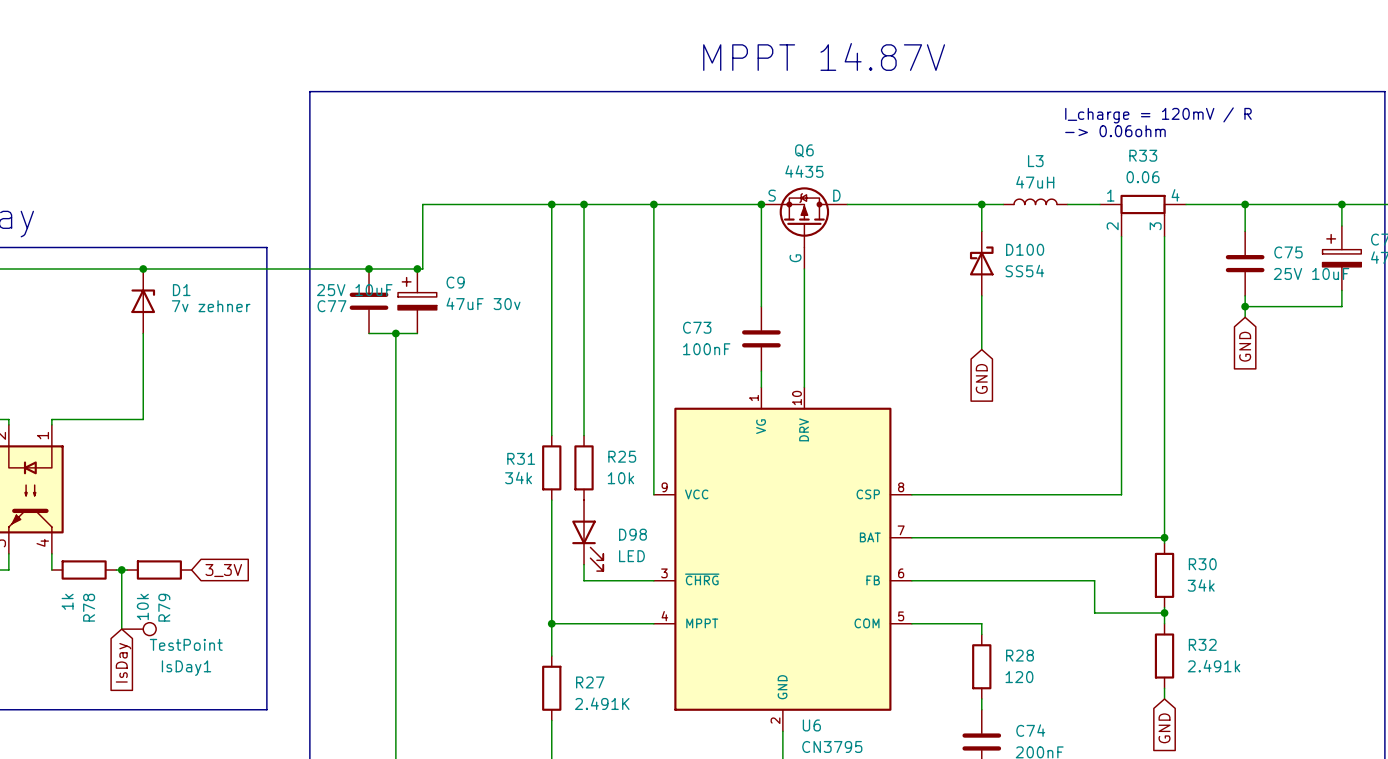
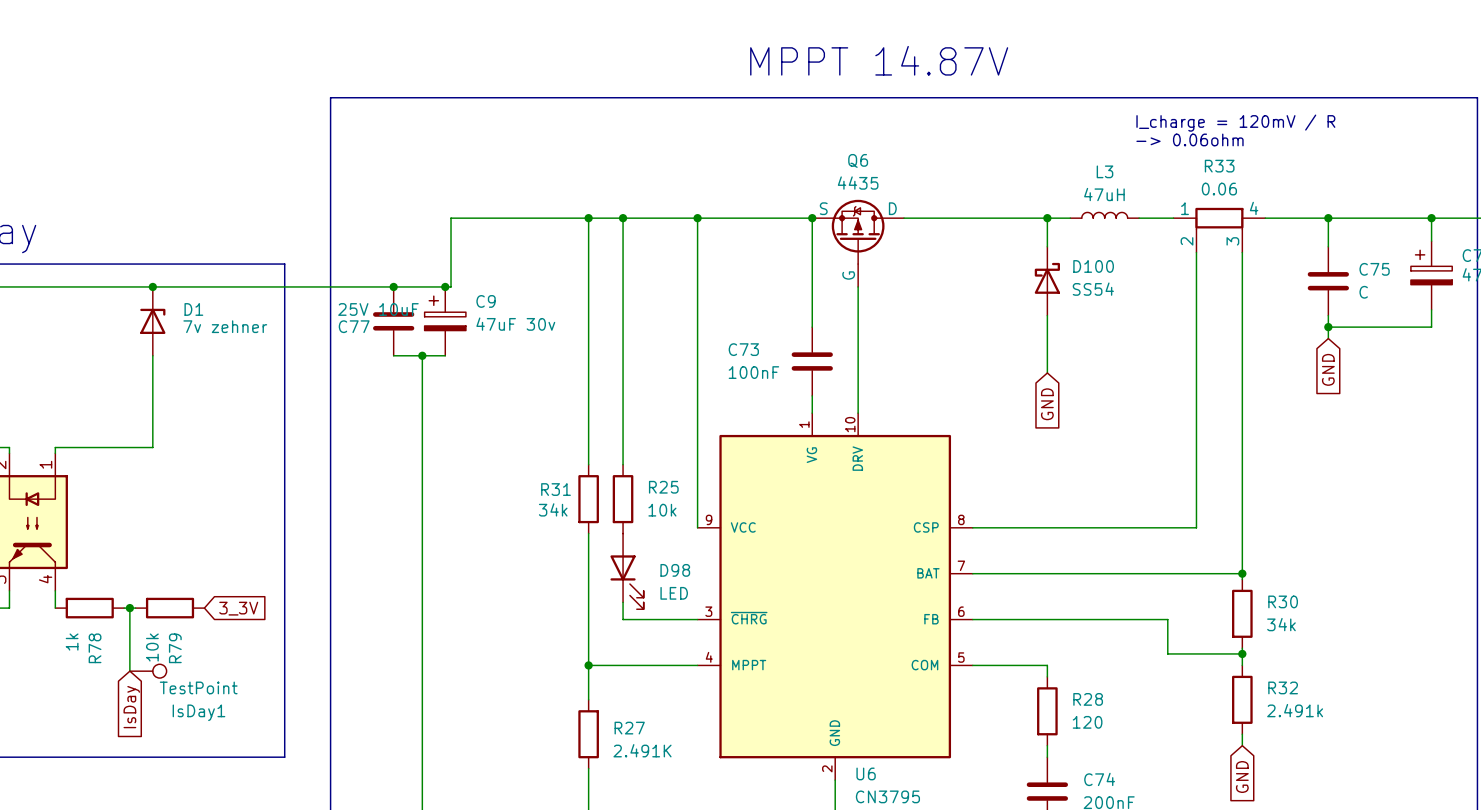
C75 value: 25V 10uF (1311, 273) -> C (1363, 292)

